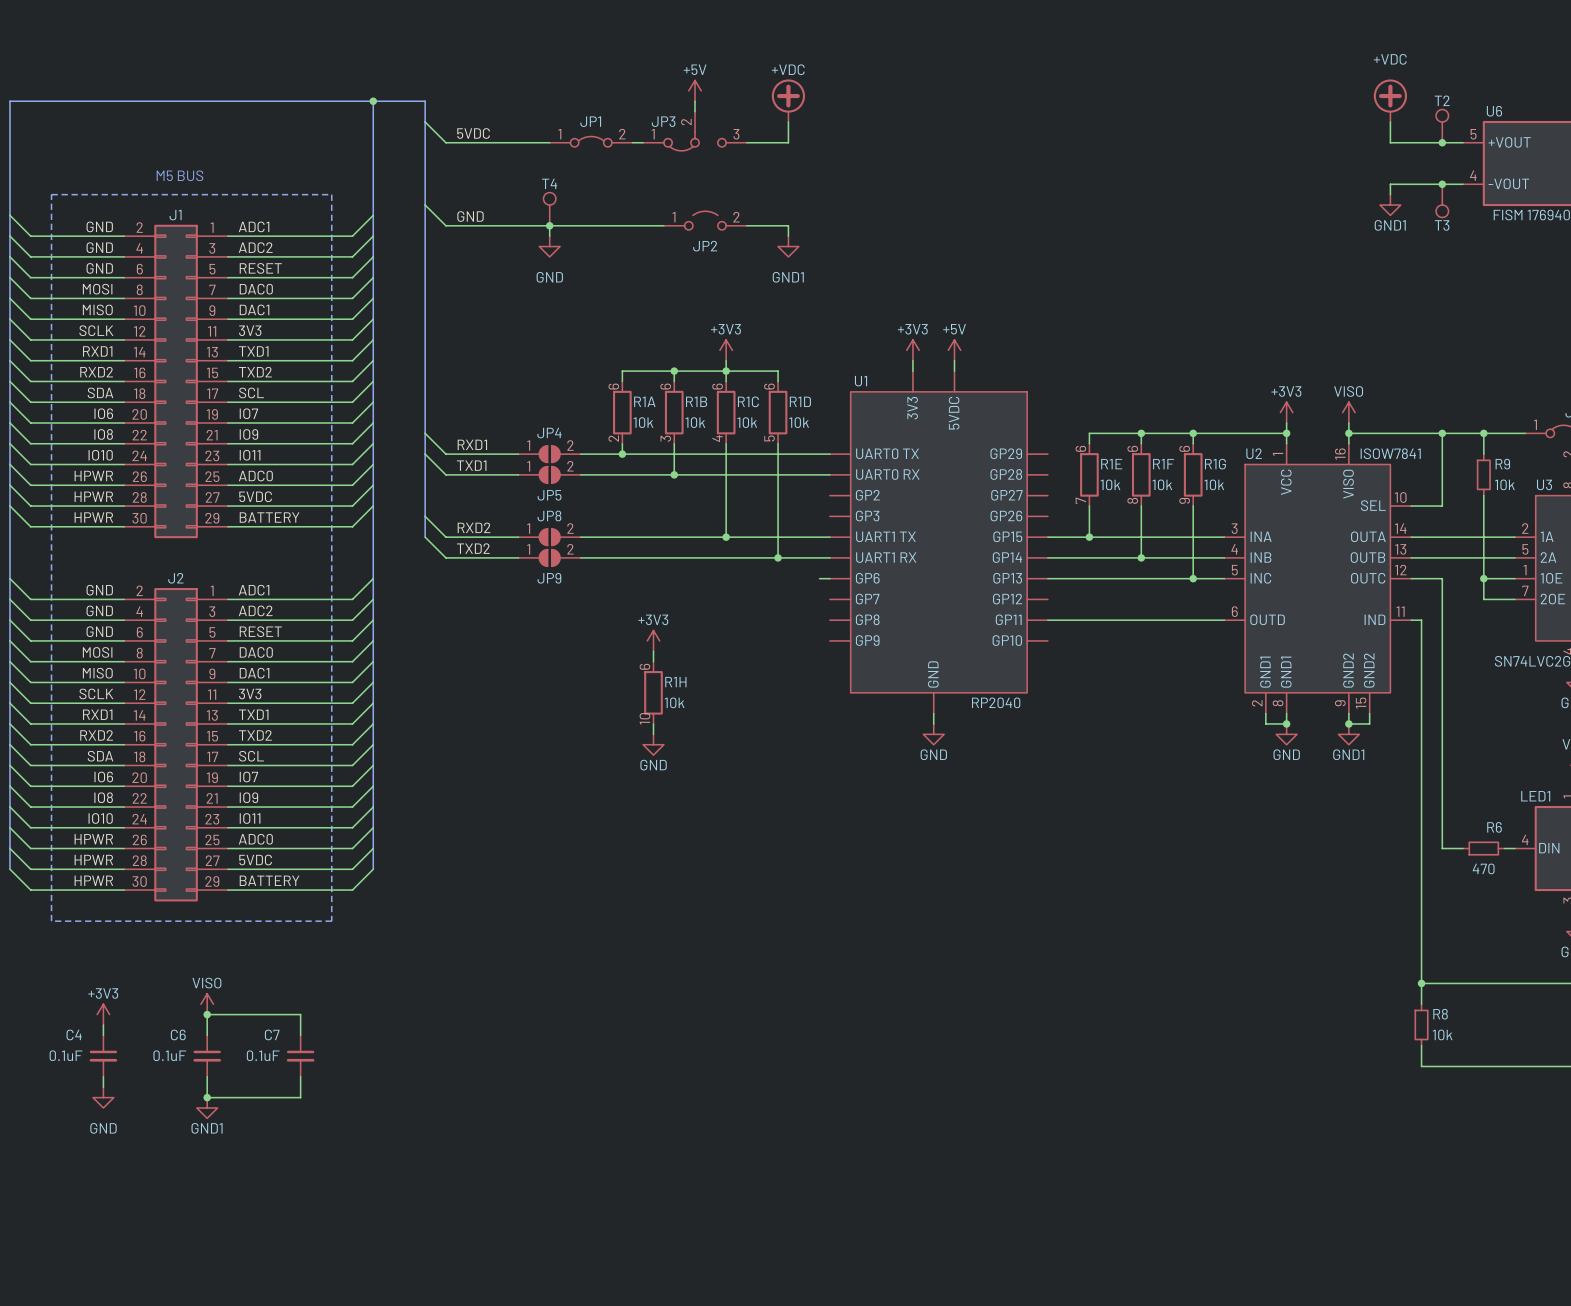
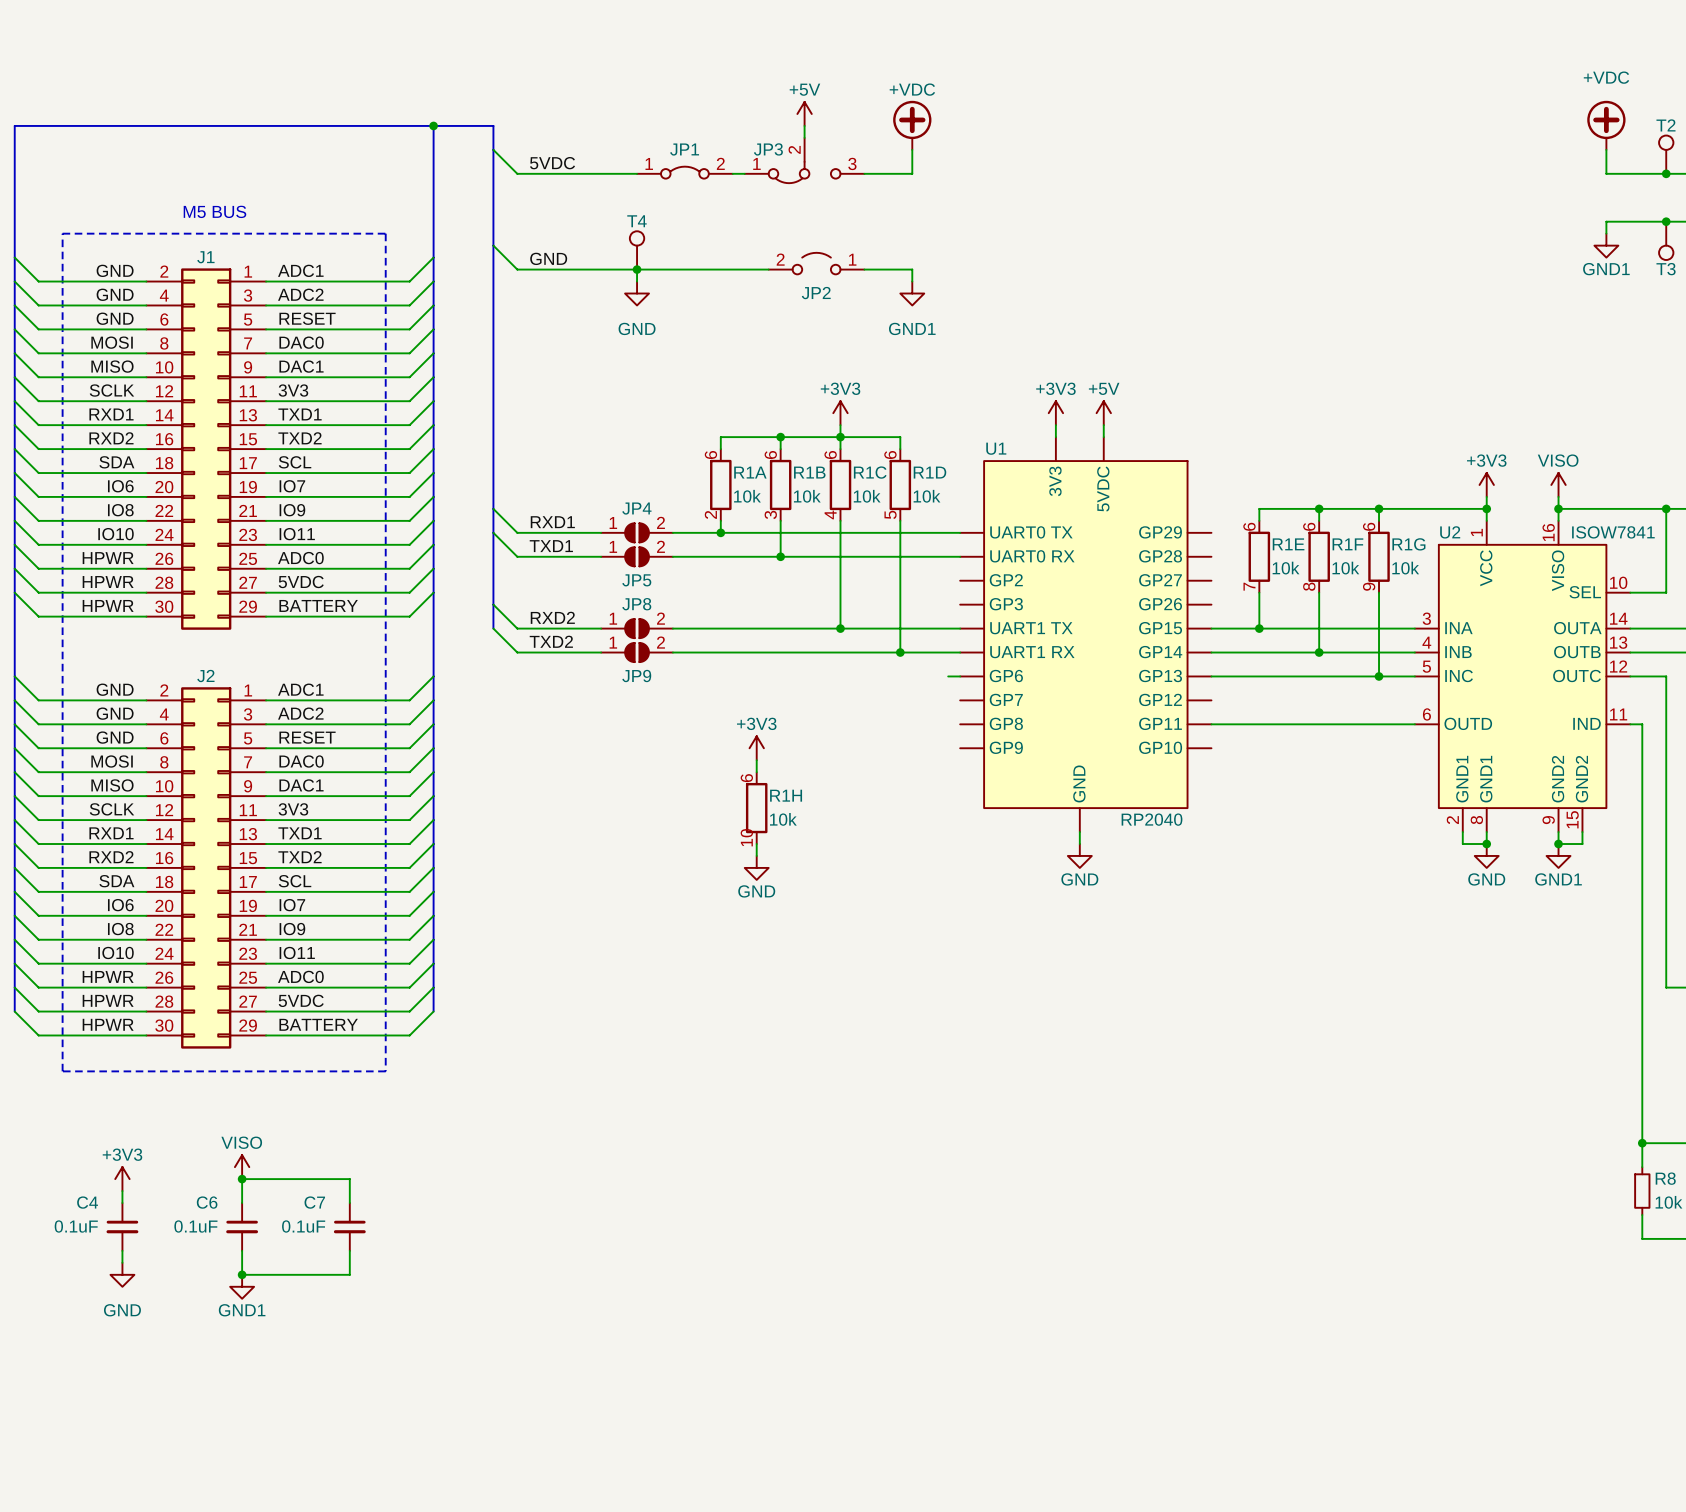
JP2 flip: as is (705, 220) -> left-right (816, 263)

